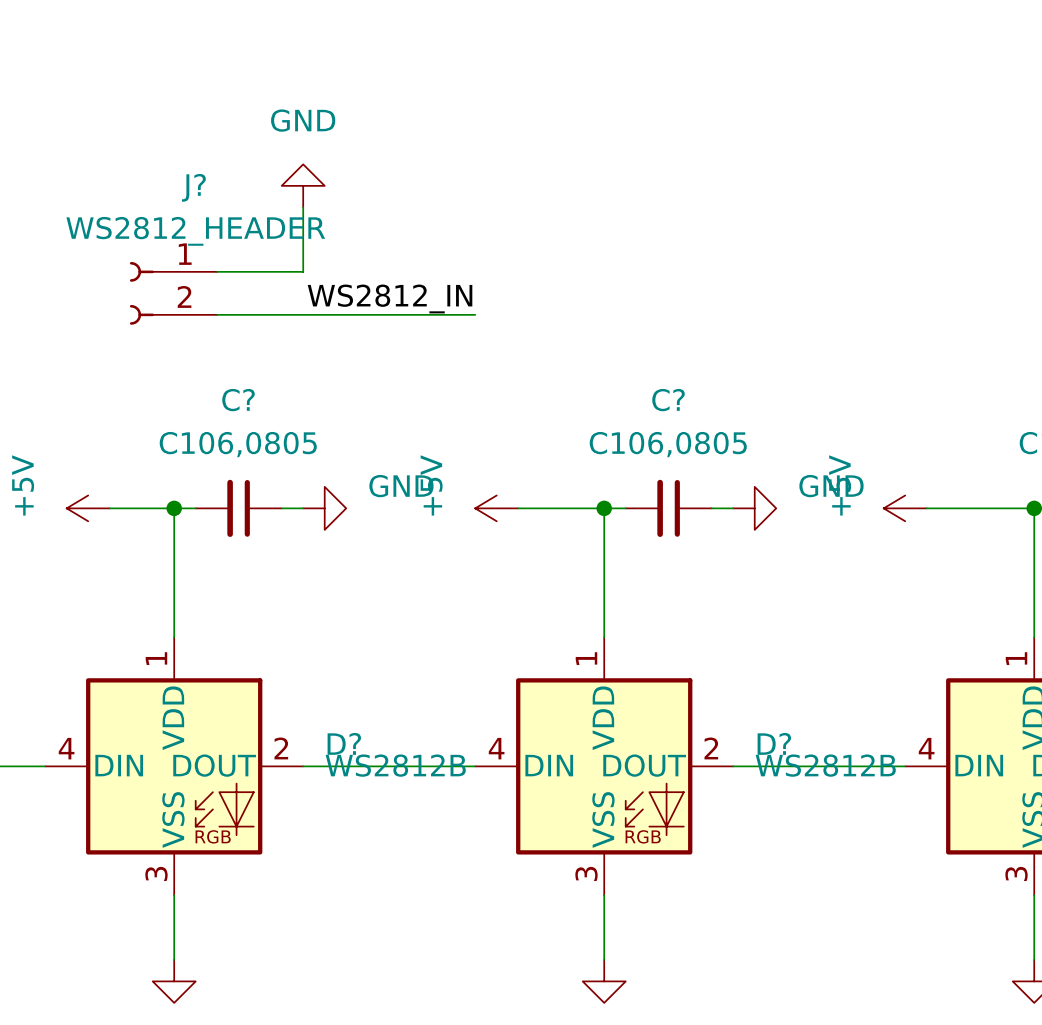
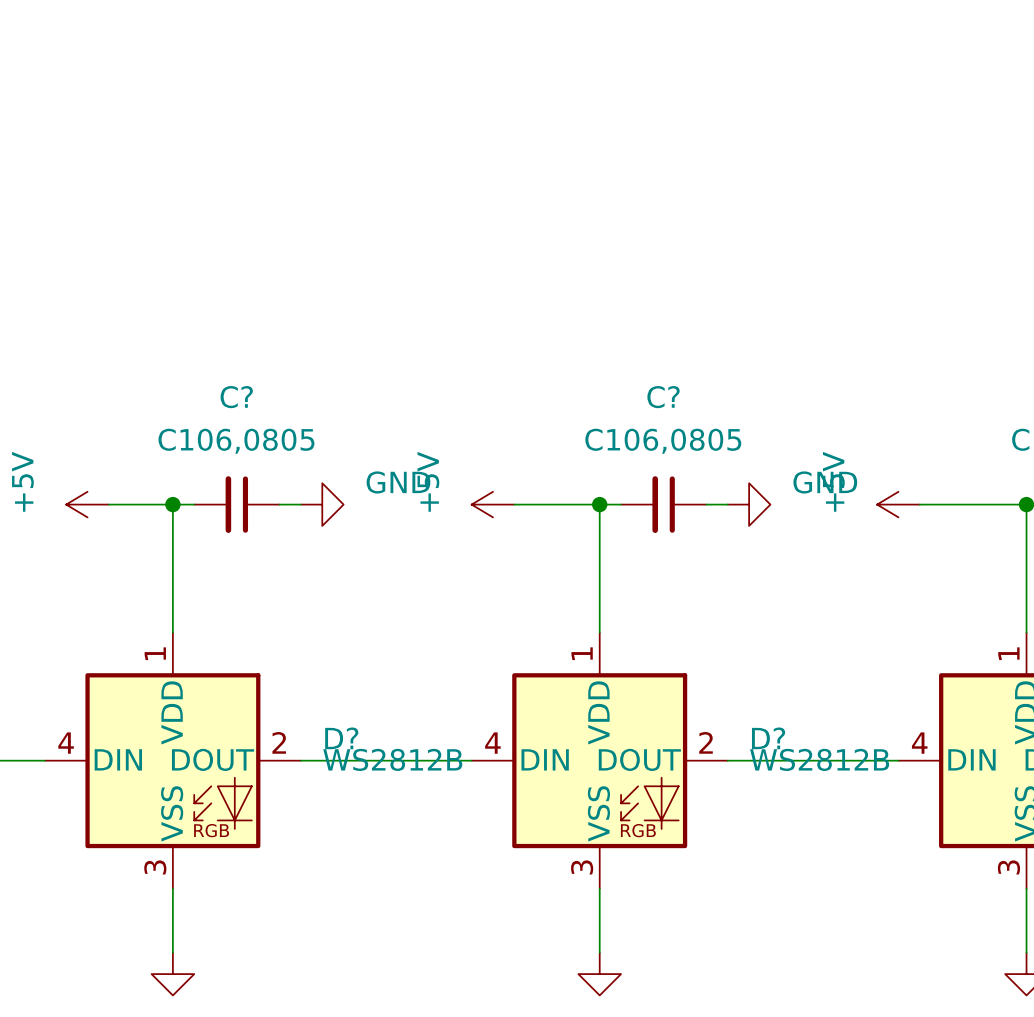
power symbol: GND (303, 185) -> none
wire: (303, 207) (303, 271) (217, 271) -> none
J?: WS2812_HEADER (173, 293) -> none
label: WS2812_IN (390, 298) -> none
wire: (217, 314) (475, 314) -> none

